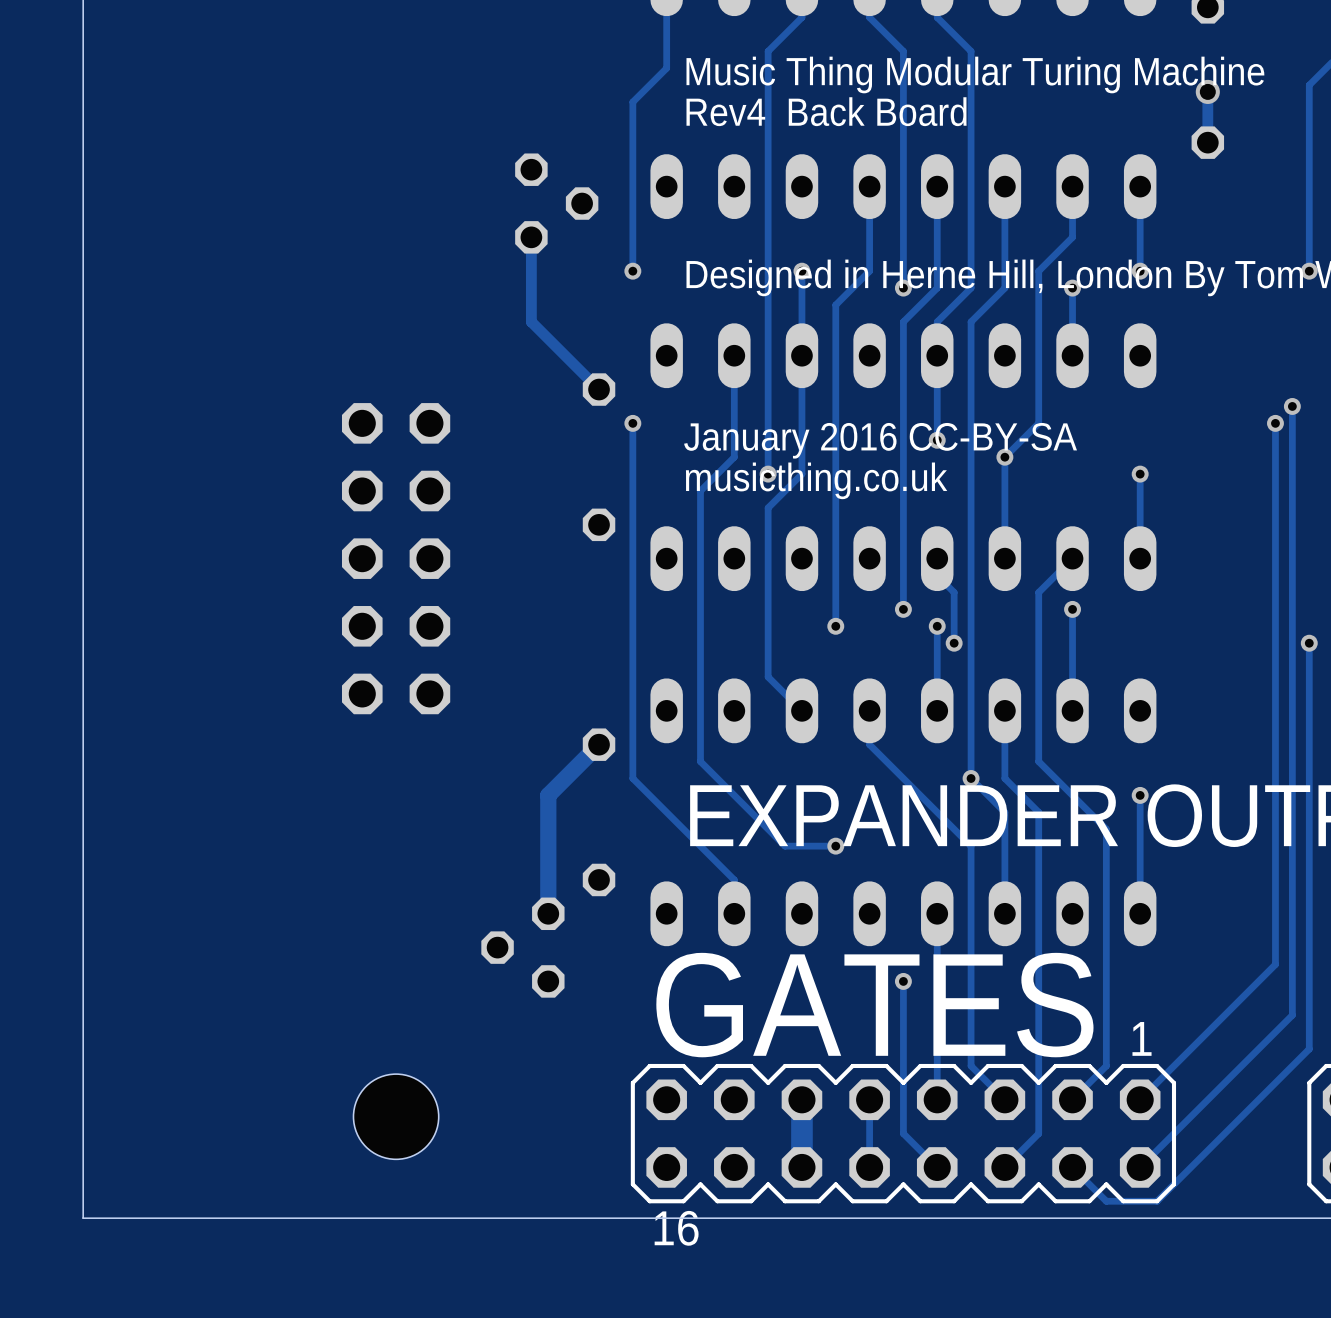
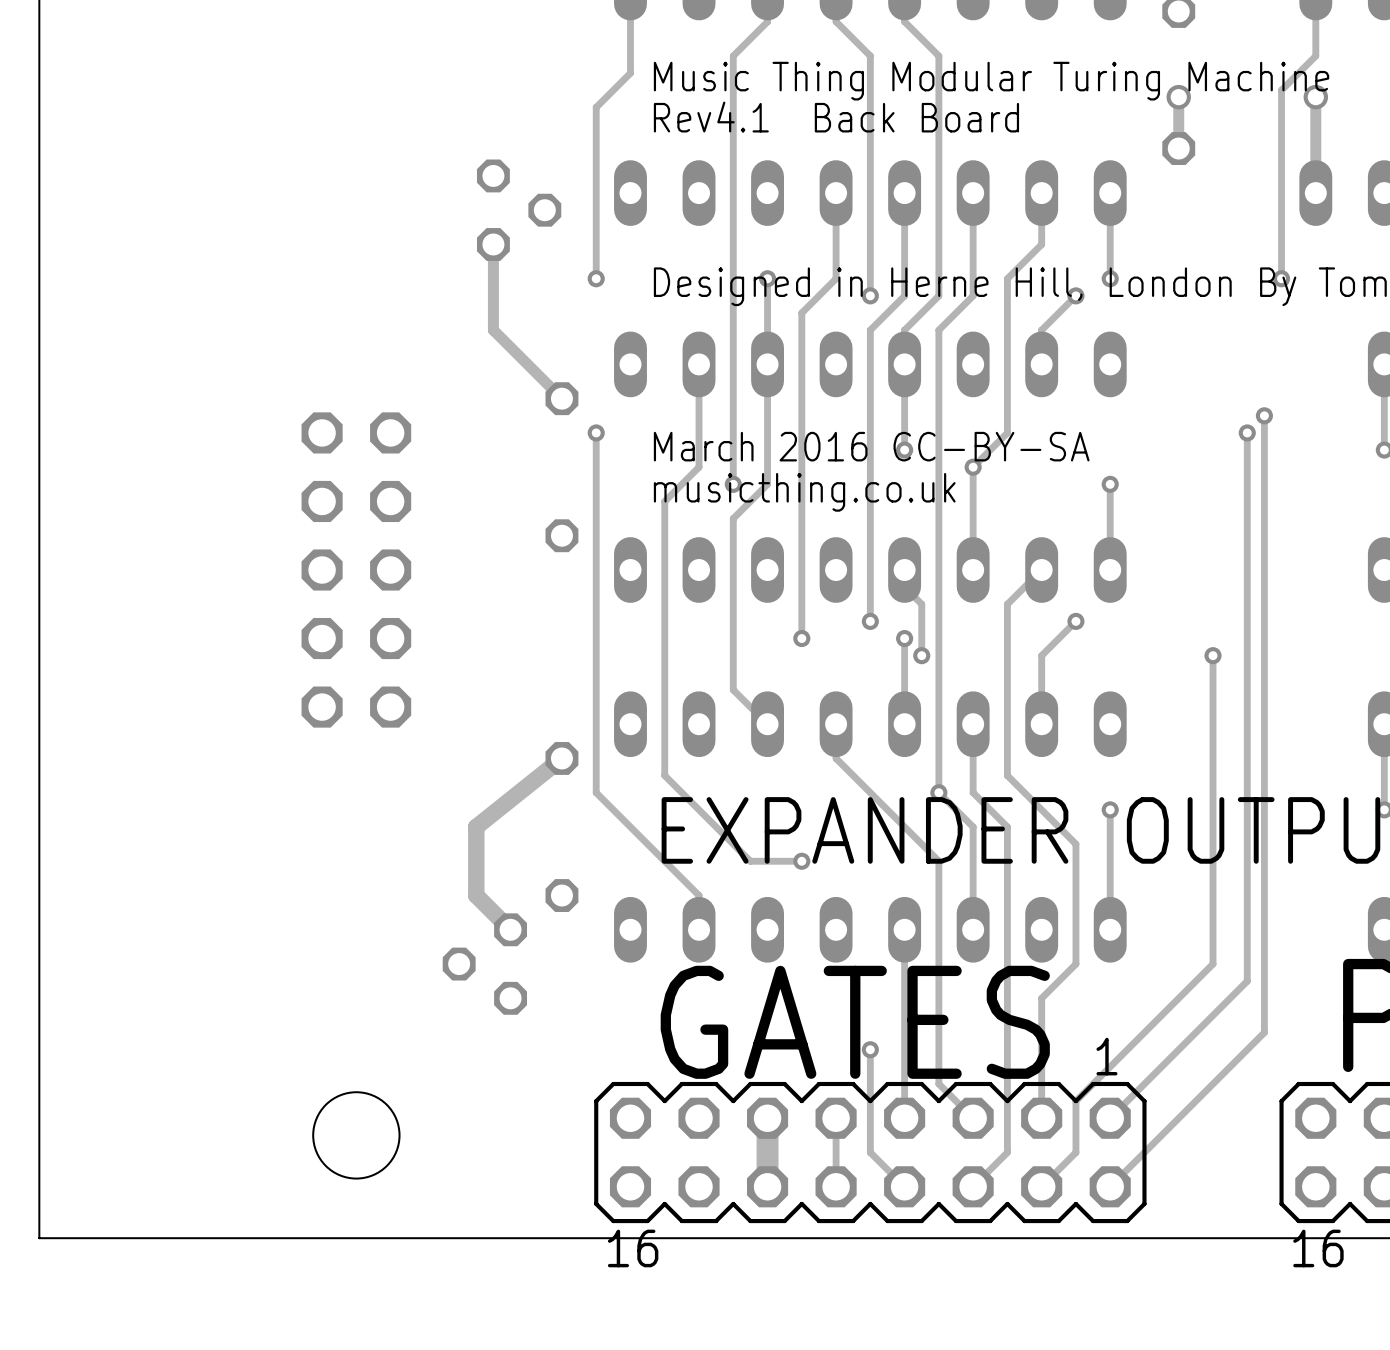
text: Rev4 Back Board (826, 111) -> Rev4.1 Back Board (836, 117)
track: (1072, 288) (1072, 321) -> (1075, 295) (1041, 330)
via position: (1072, 288) -> (1075, 295)
text: January 2016 CC-BY-SA (880, 440) -> March 2016 CC-BY-SA (871, 446)
track: (1072, 609) (1072, 643) -> (1075, 621) (1041, 655)
via position: (1072, 609) -> (1075, 621)
track: (1309, 643) (1309, 1049) (1157, 1201) (1106, 1201) (1072, 1167) -> (1213, 655) (1213, 964) (1075, 1101) (1075, 1152) (1041, 1186)
via position: (1309, 643) -> (1213, 655)
track: (599, 744) (548, 795) (548, 913) -> (561, 758) (476, 827) (476, 895) (510, 929)
track: (1106, 947) (1106, 1065) (1072, 1099) -> (1075, 964) (1041, 998) (1041, 1118)
track: (903, 981) (903, 1032) -> none
via position: (903, 981) -> (870, 1049)

